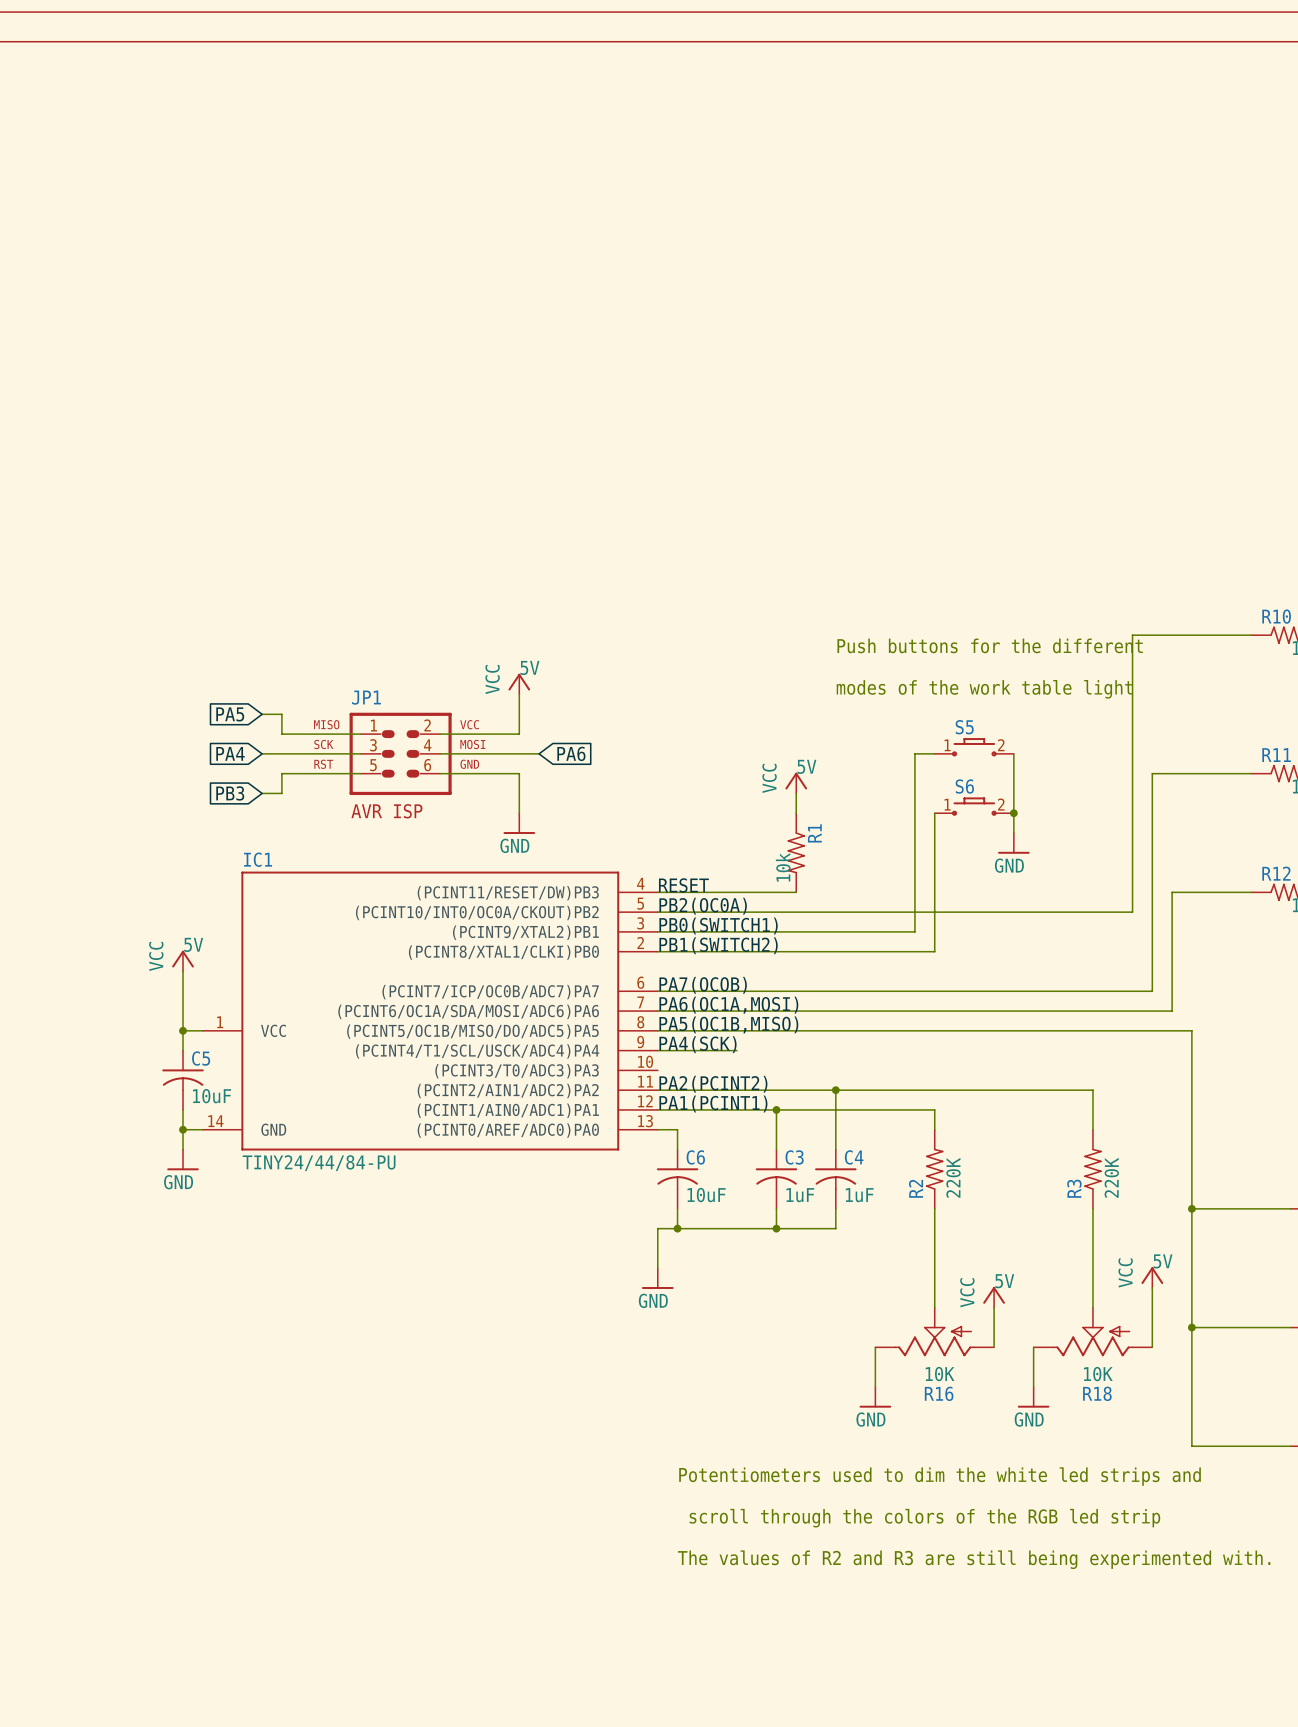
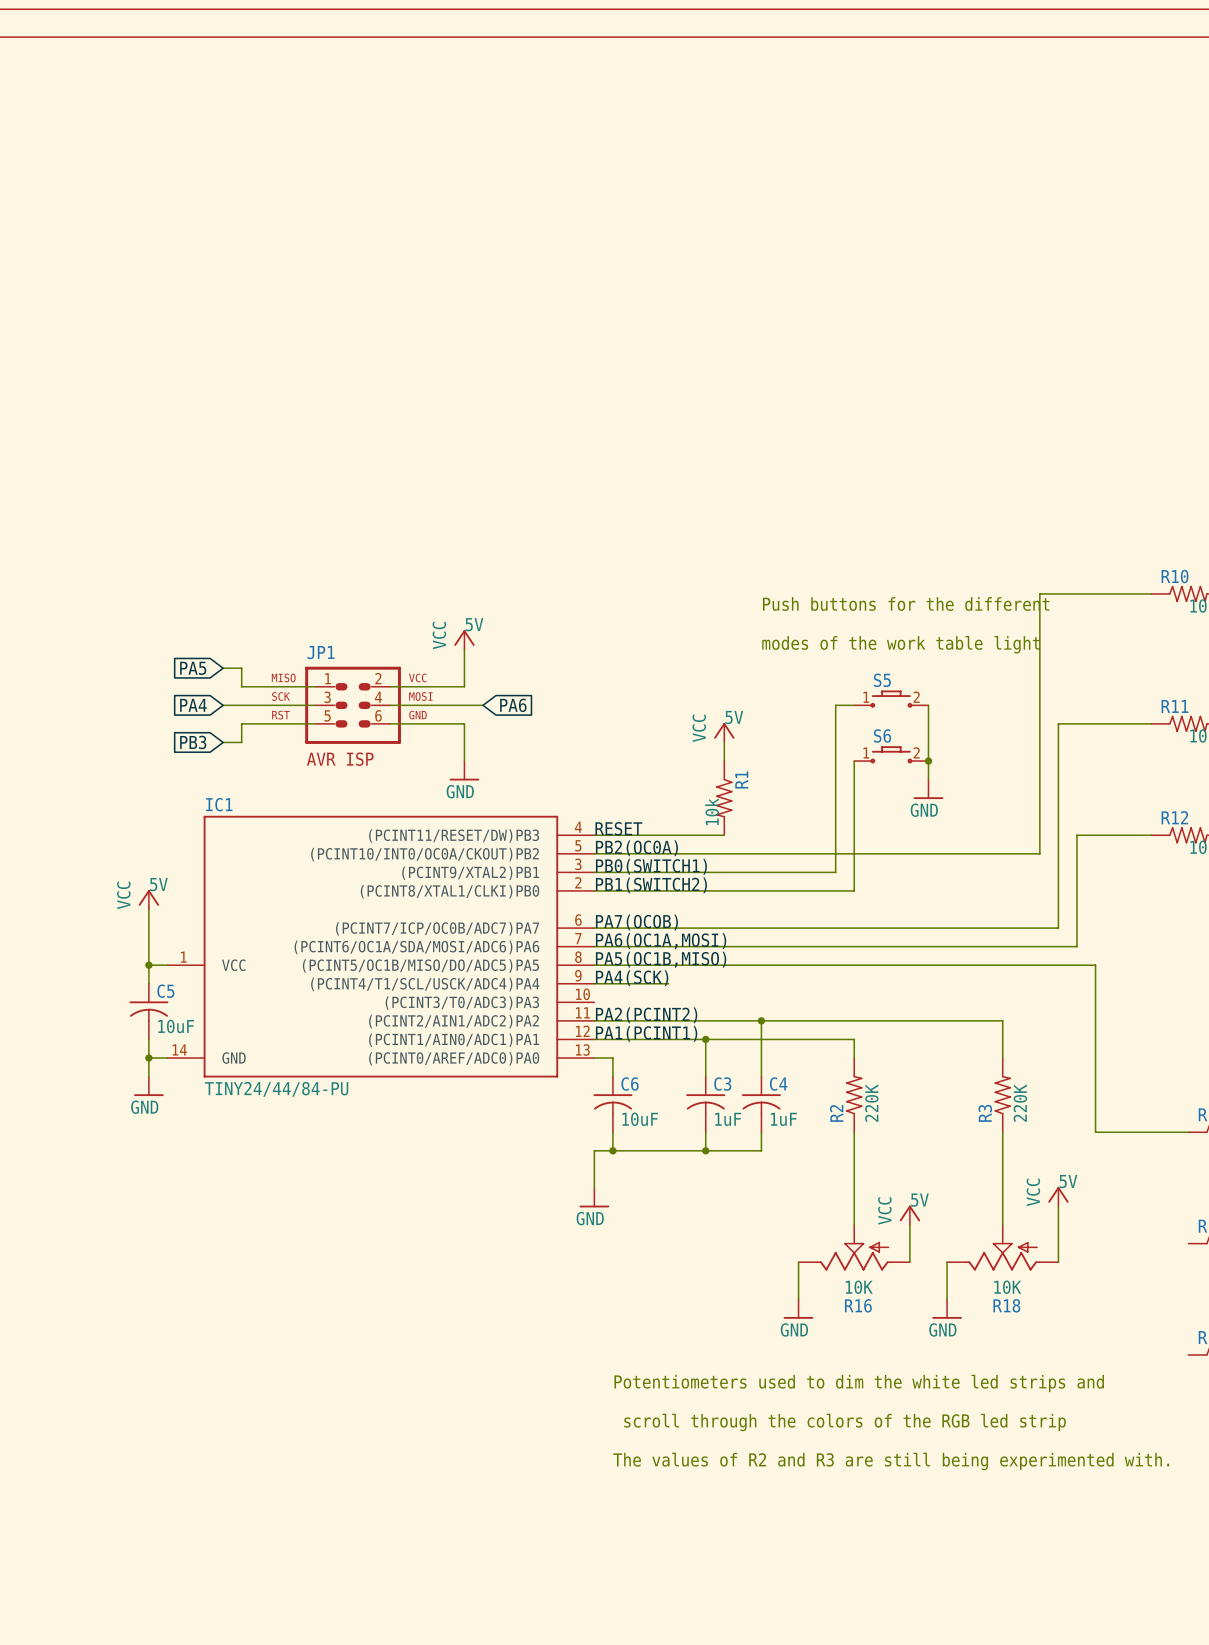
wire: (1191, 1208) (1191, 1446) (1290, 1446) -> none
junction: (1191, 1208) -> none
wire: (1191, 1327) (1290, 1327) -> none
junction: (1191, 1327) -> none

